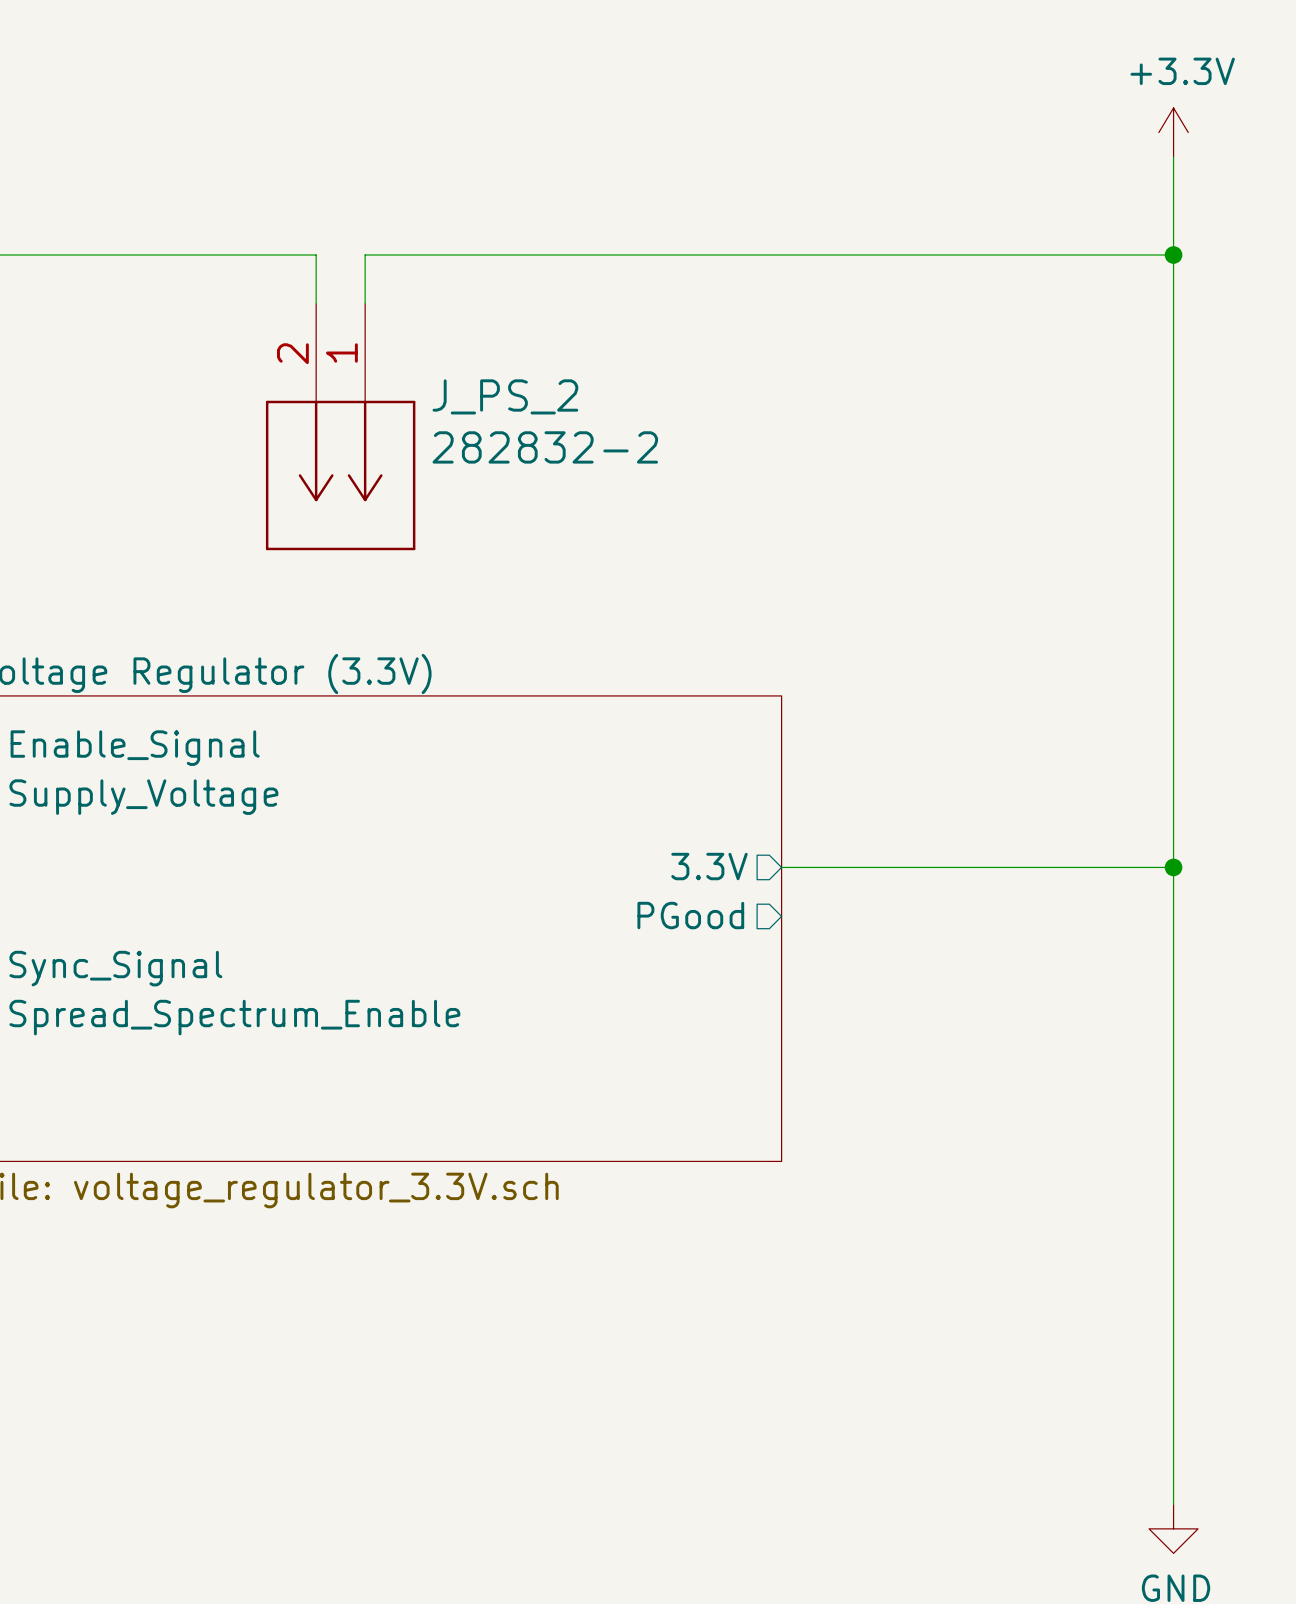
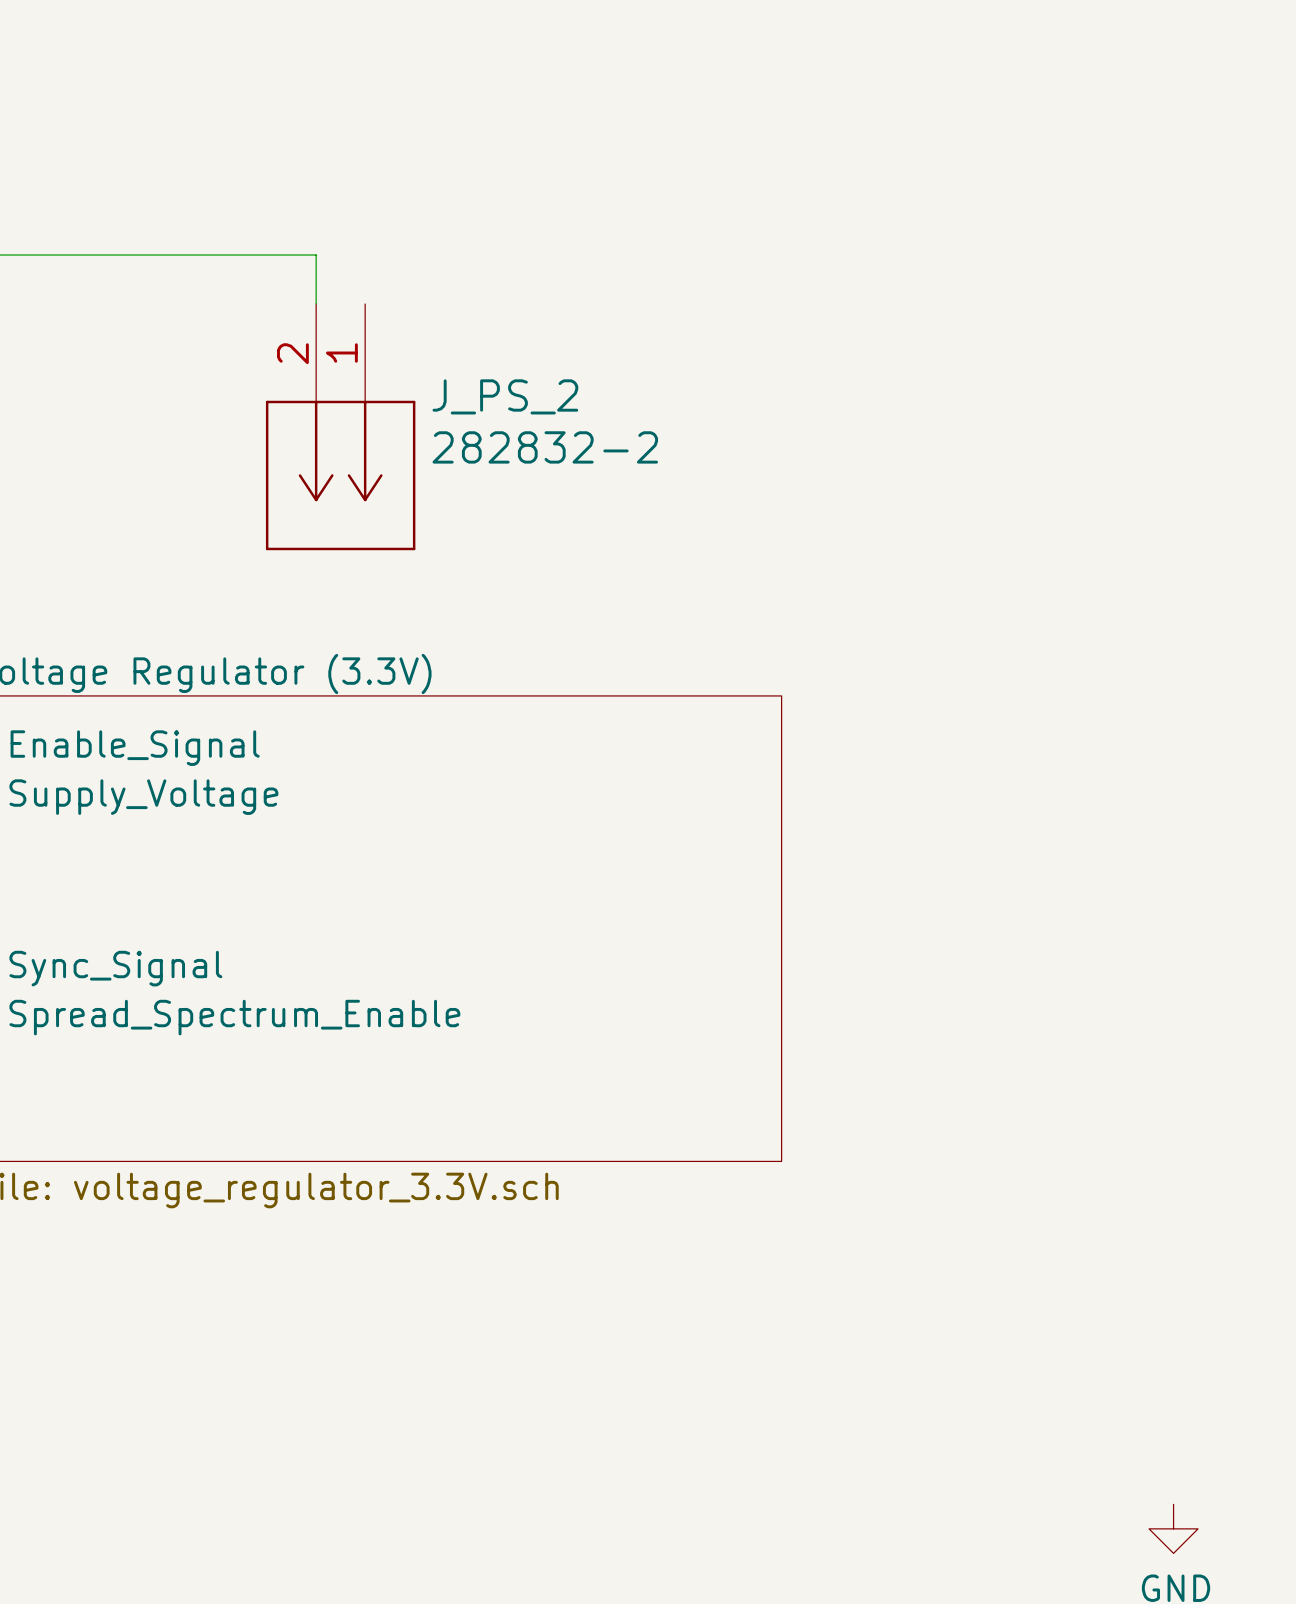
power symbol: +3.3V (1173, 132) -> none
wire: (1173, 157) (1173, 1504) -> none
wire: (1173, 255) (365, 255) (365, 303) -> none
junction: (1173, 255) -> none
sheet pin: 3.3V (709, 866) -> none
wire: (781, 867) (1173, 867) -> none
junction: (1173, 867) -> none
sheet pin: PGood (690, 915) -> none

